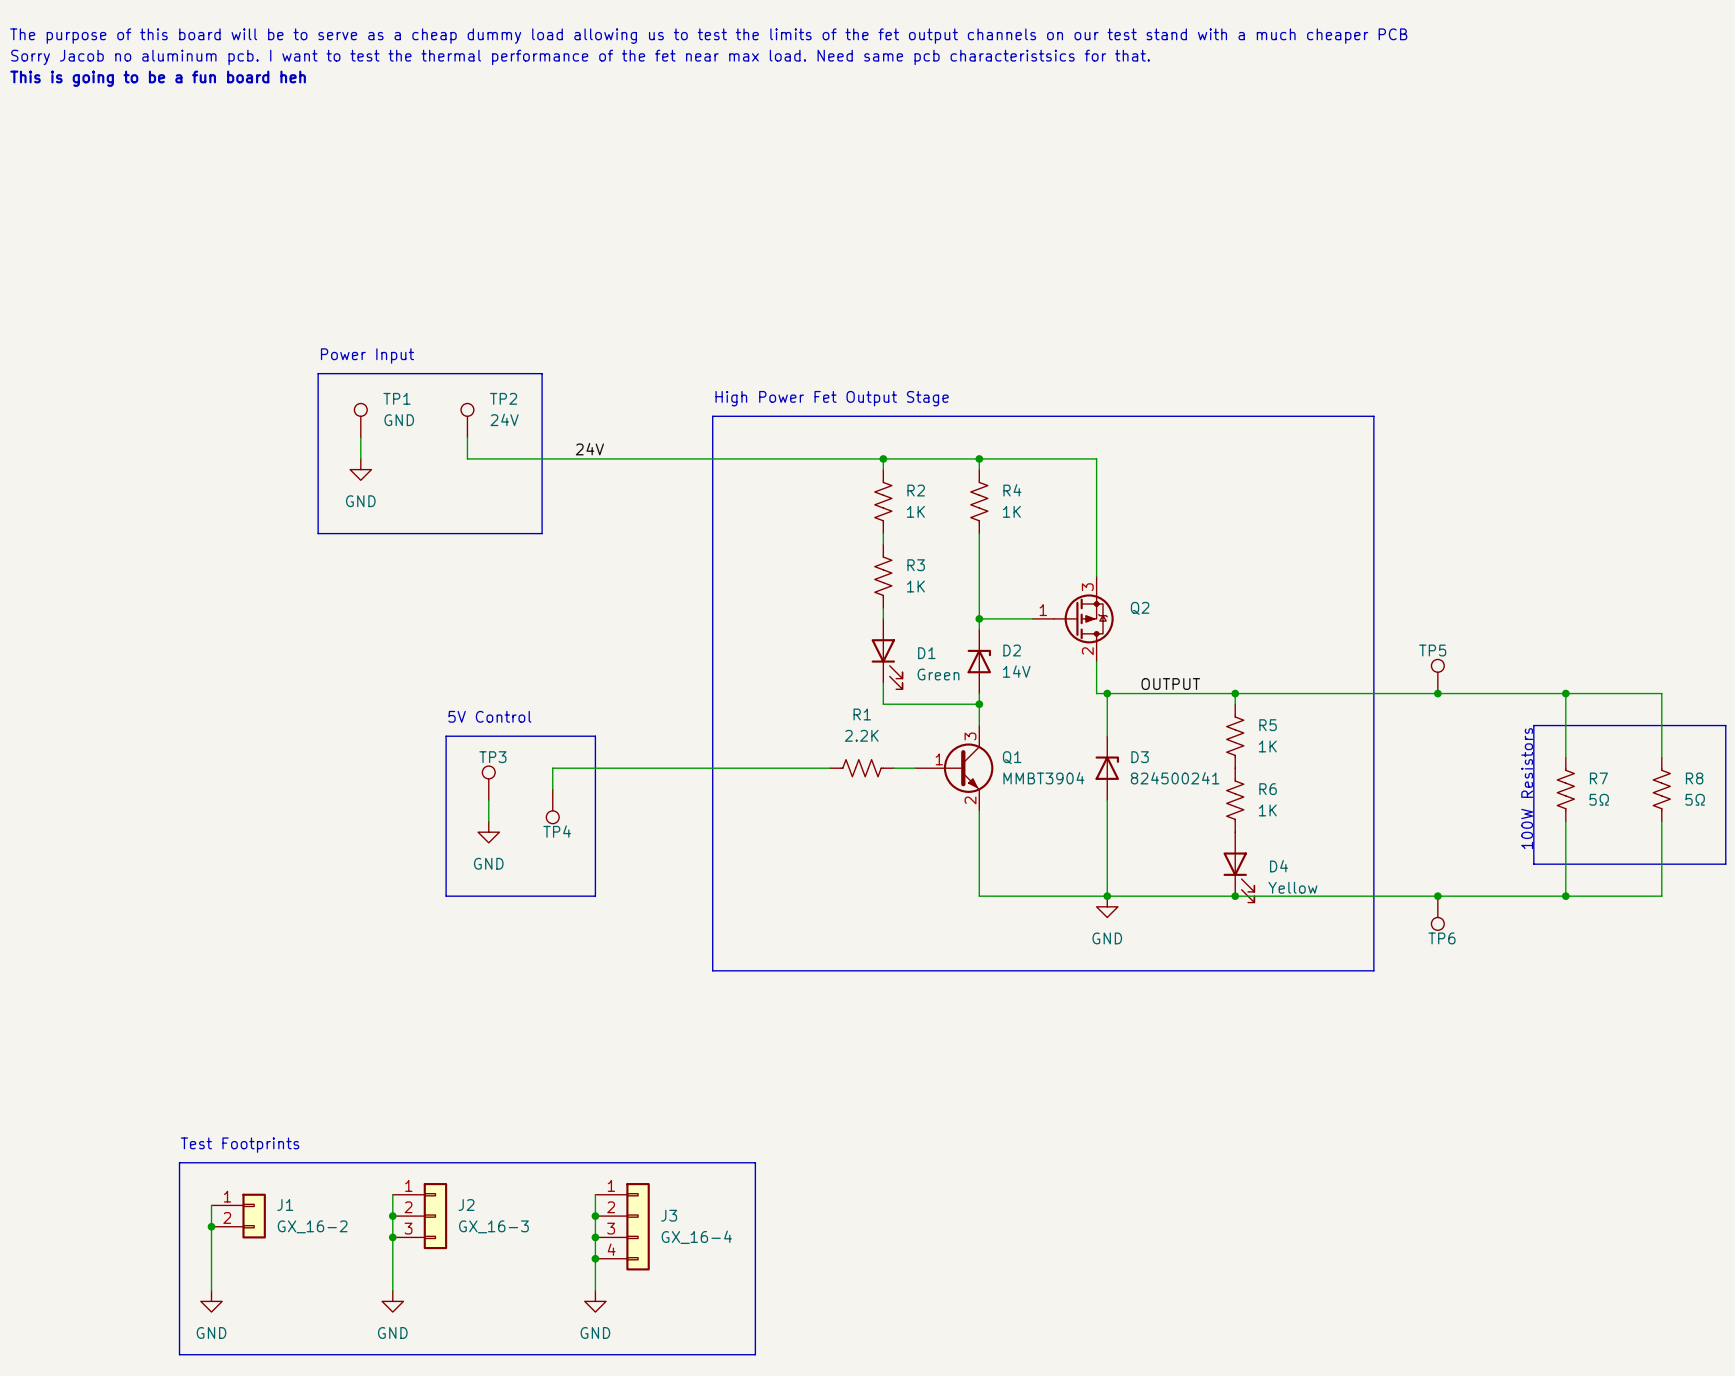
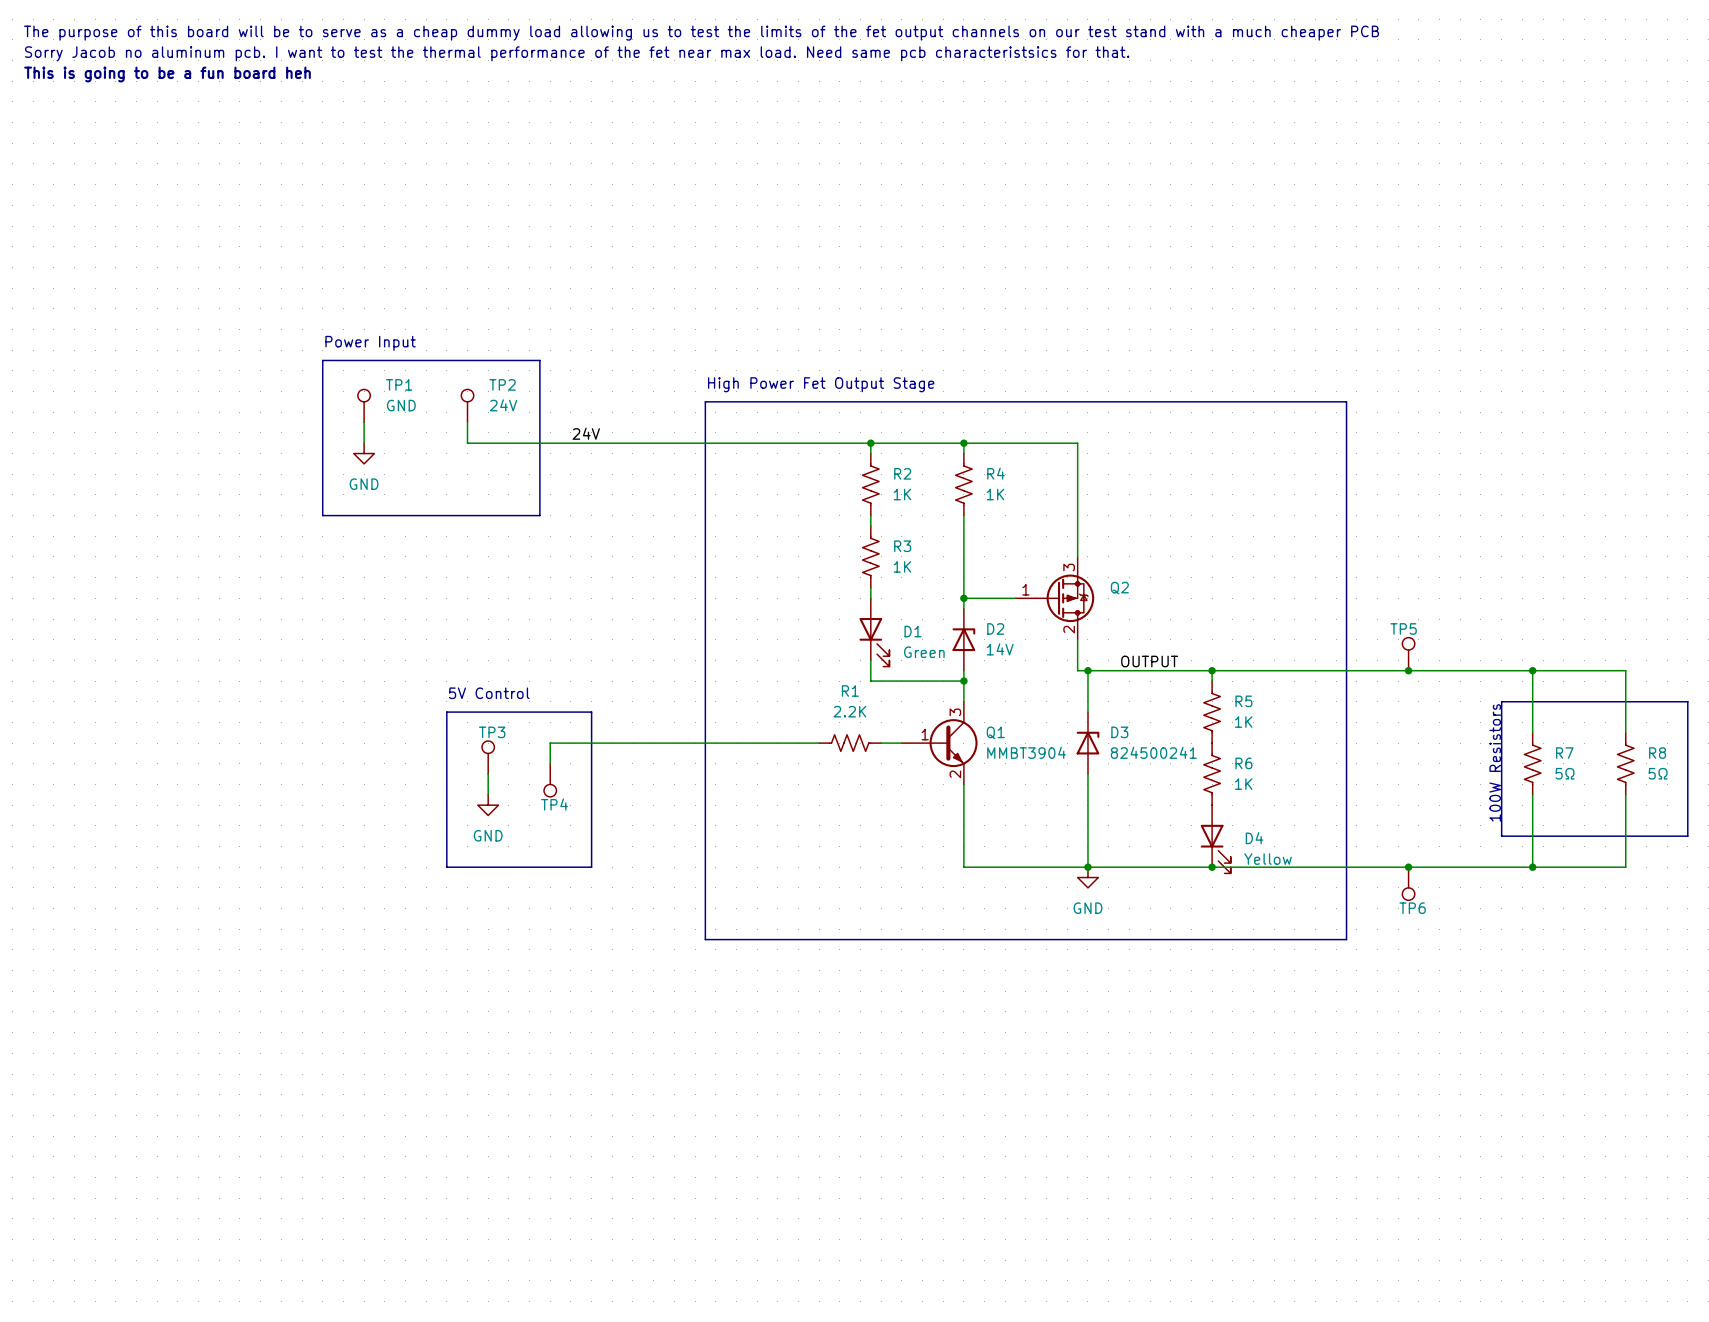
text: Test Footprints (240, 1145) -> none
line: (179, 1162) (179, 1354) (755, 1354) (755, 1162) (179, 1162) -> none
wire: (392, 1194) (392, 1290) -> none
wire: (595, 1194) (595, 1290) -> none
wire: (211, 1205) (211, 1290) -> none
J1: GX_16-2 (238, 1216) -> none
junction: (392, 1216) -> none
J2: GX_16-3 (419, 1216) -> none
junction: (595, 1216) -> none
junction: (211, 1226) -> none
J3: GX_16-4 (622, 1226) -> none
junction: (392, 1237) -> none
junction: (595, 1237) -> none
junction: (595, 1258) -> none
power symbol: GND (211, 1301) -> none
power symbol: GND (392, 1301) -> none
power symbol: GND (595, 1301) -> none

